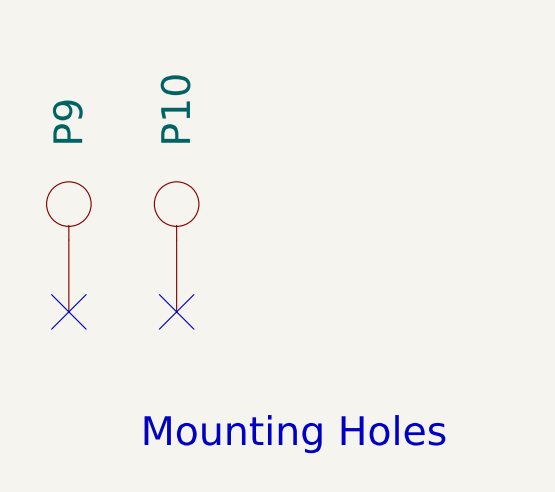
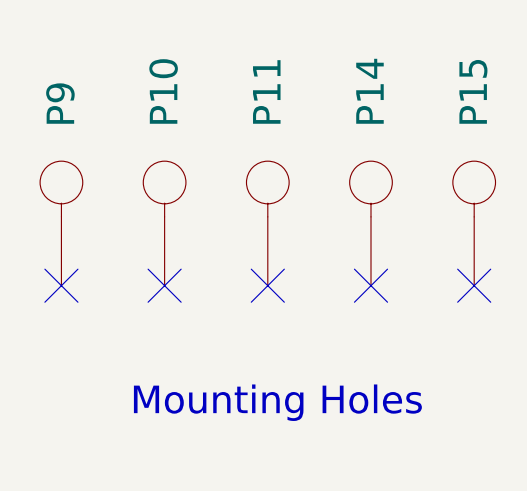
P11: none -> (267, 223)
P14: none -> (371, 223)
P15: none -> (474, 223)
no-connect mark: none -> (267, 285)
no-connect mark: none -> (371, 285)
no-connect mark: none -> (474, 285)

